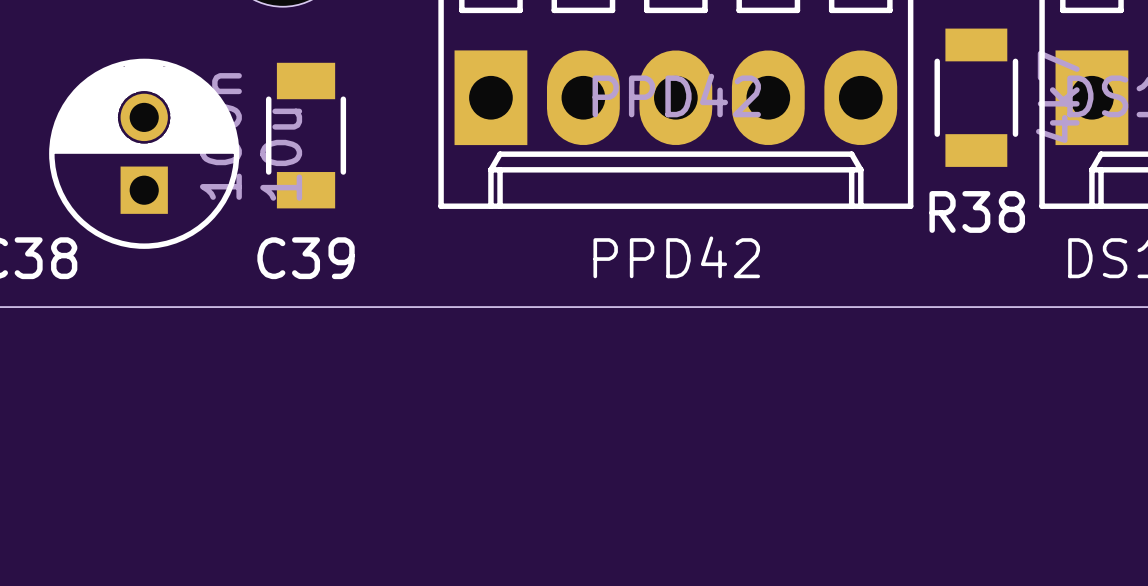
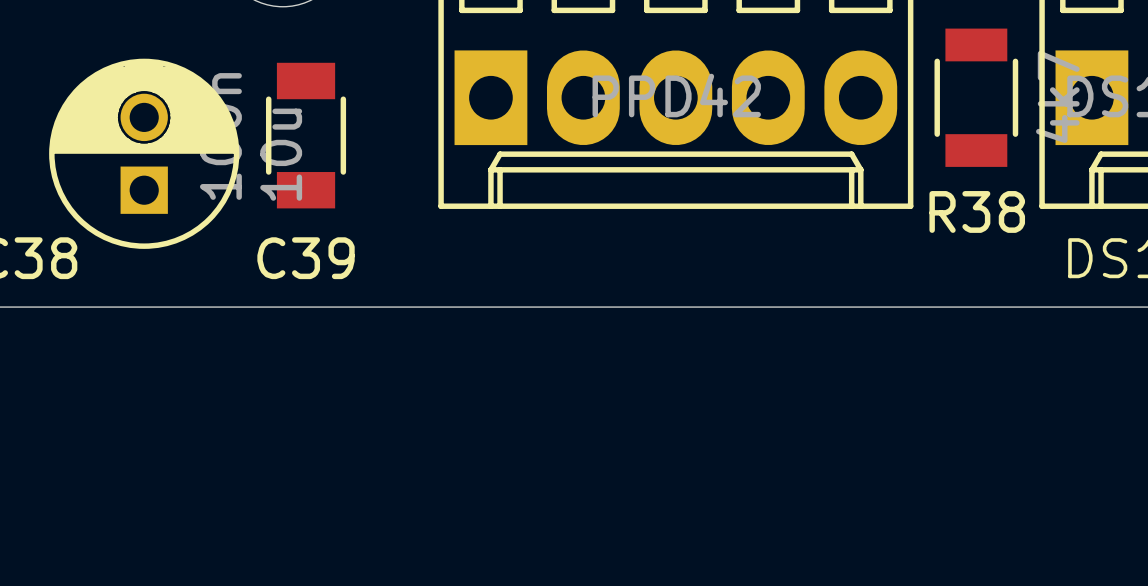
text: PPD42 (676, 257) -> none

